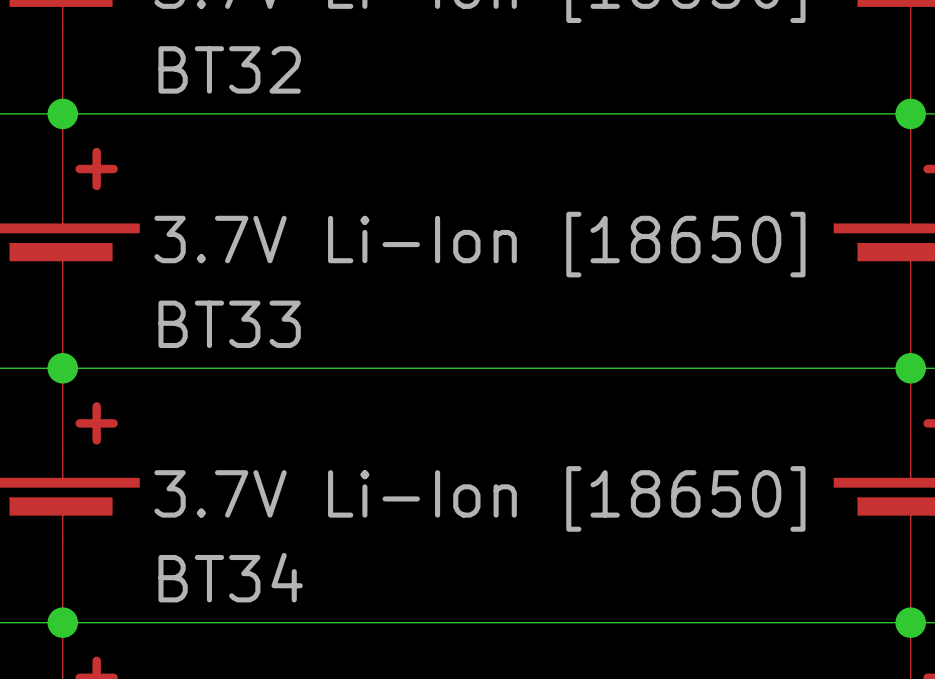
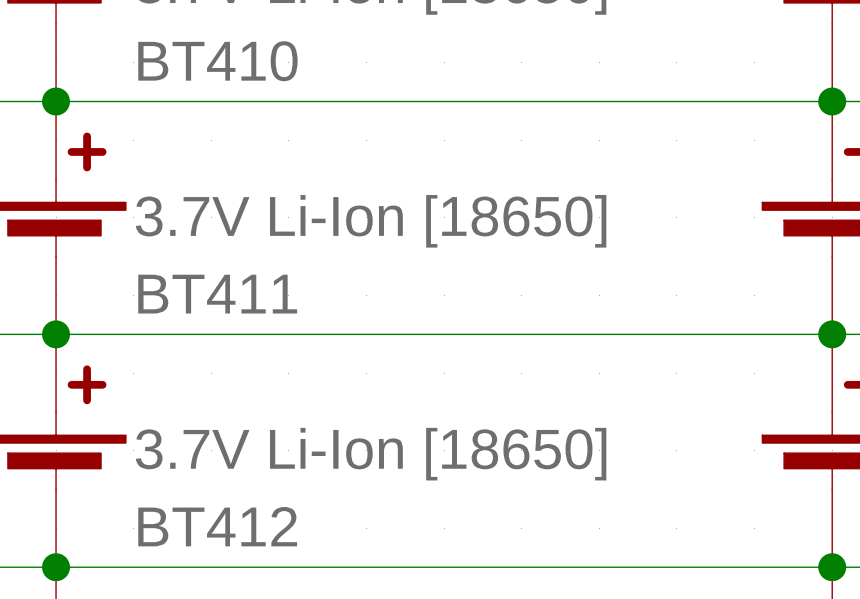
BT32 name: BT32 (229, 69) -> BT410 (217, 61)
BT33 name: BT33 (229, 324) -> BT411 (217, 294)
BT34 name: BT34 (230, 577) -> BT412 (217, 526)

